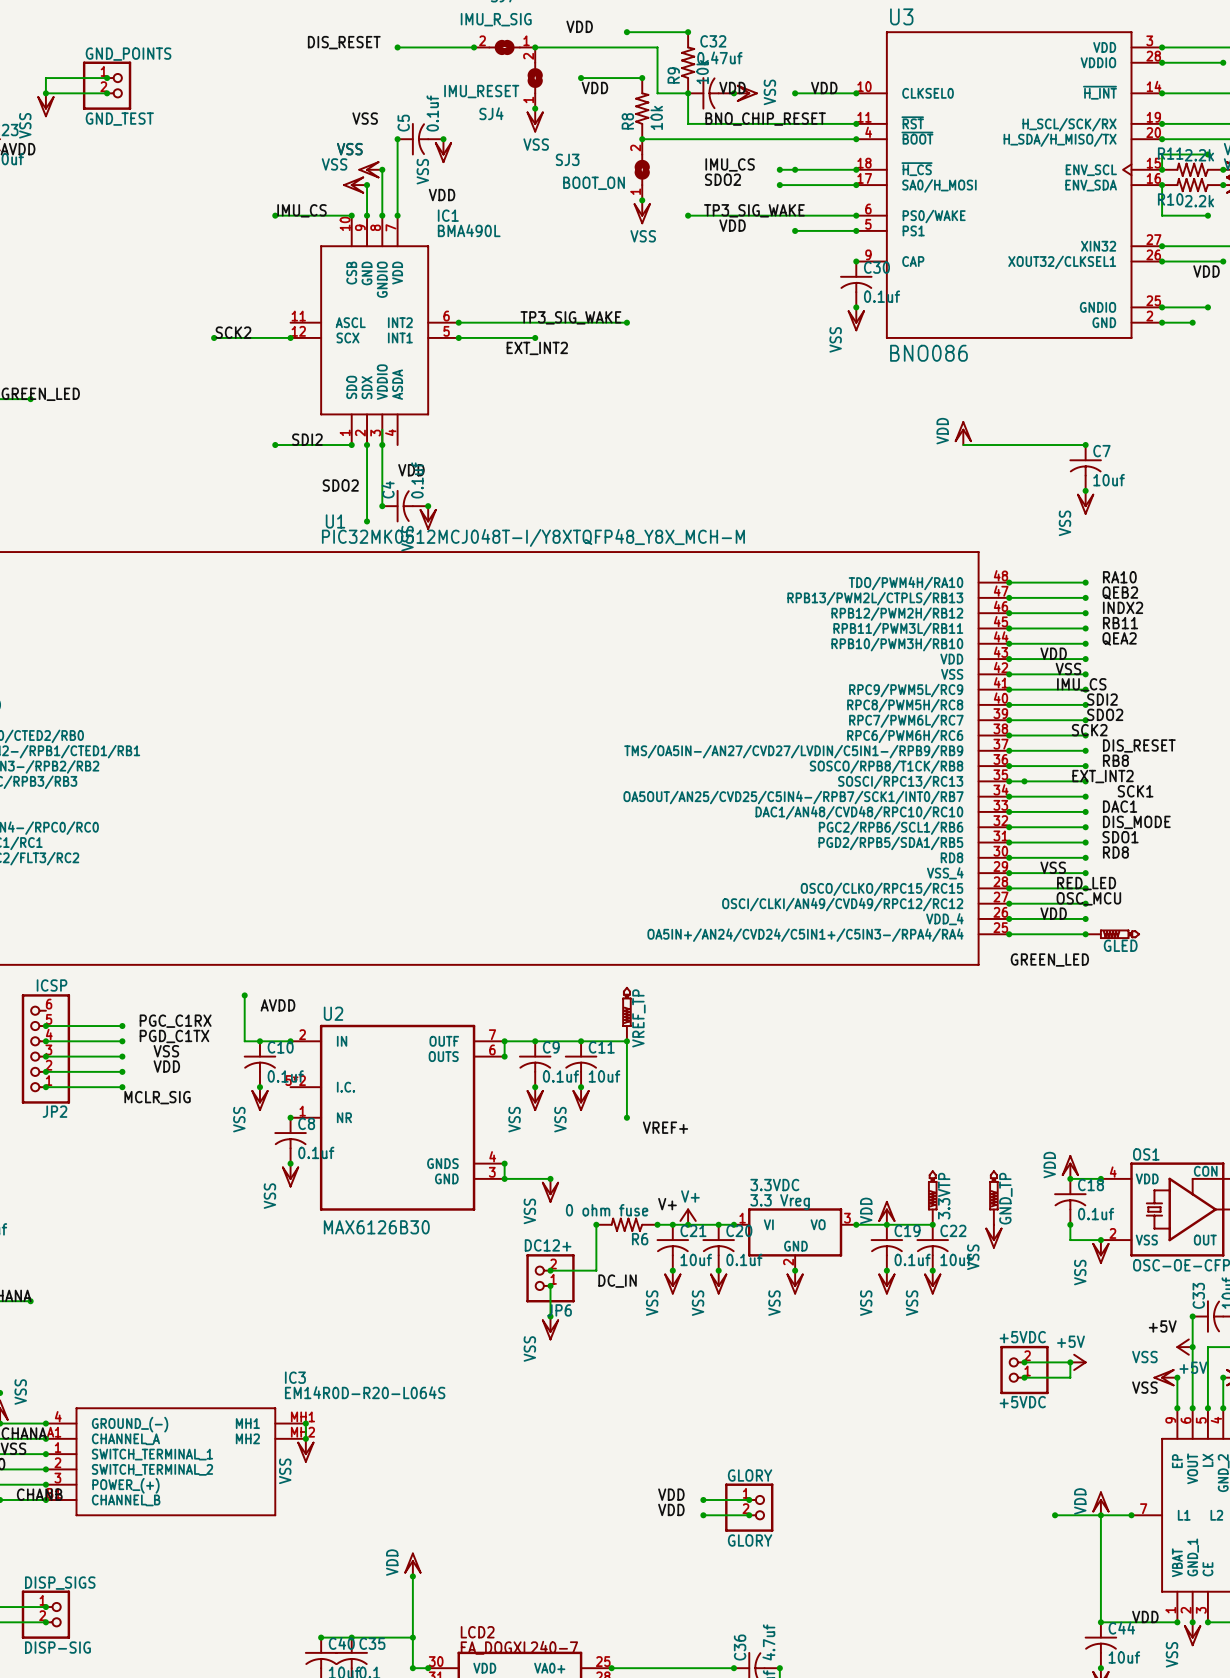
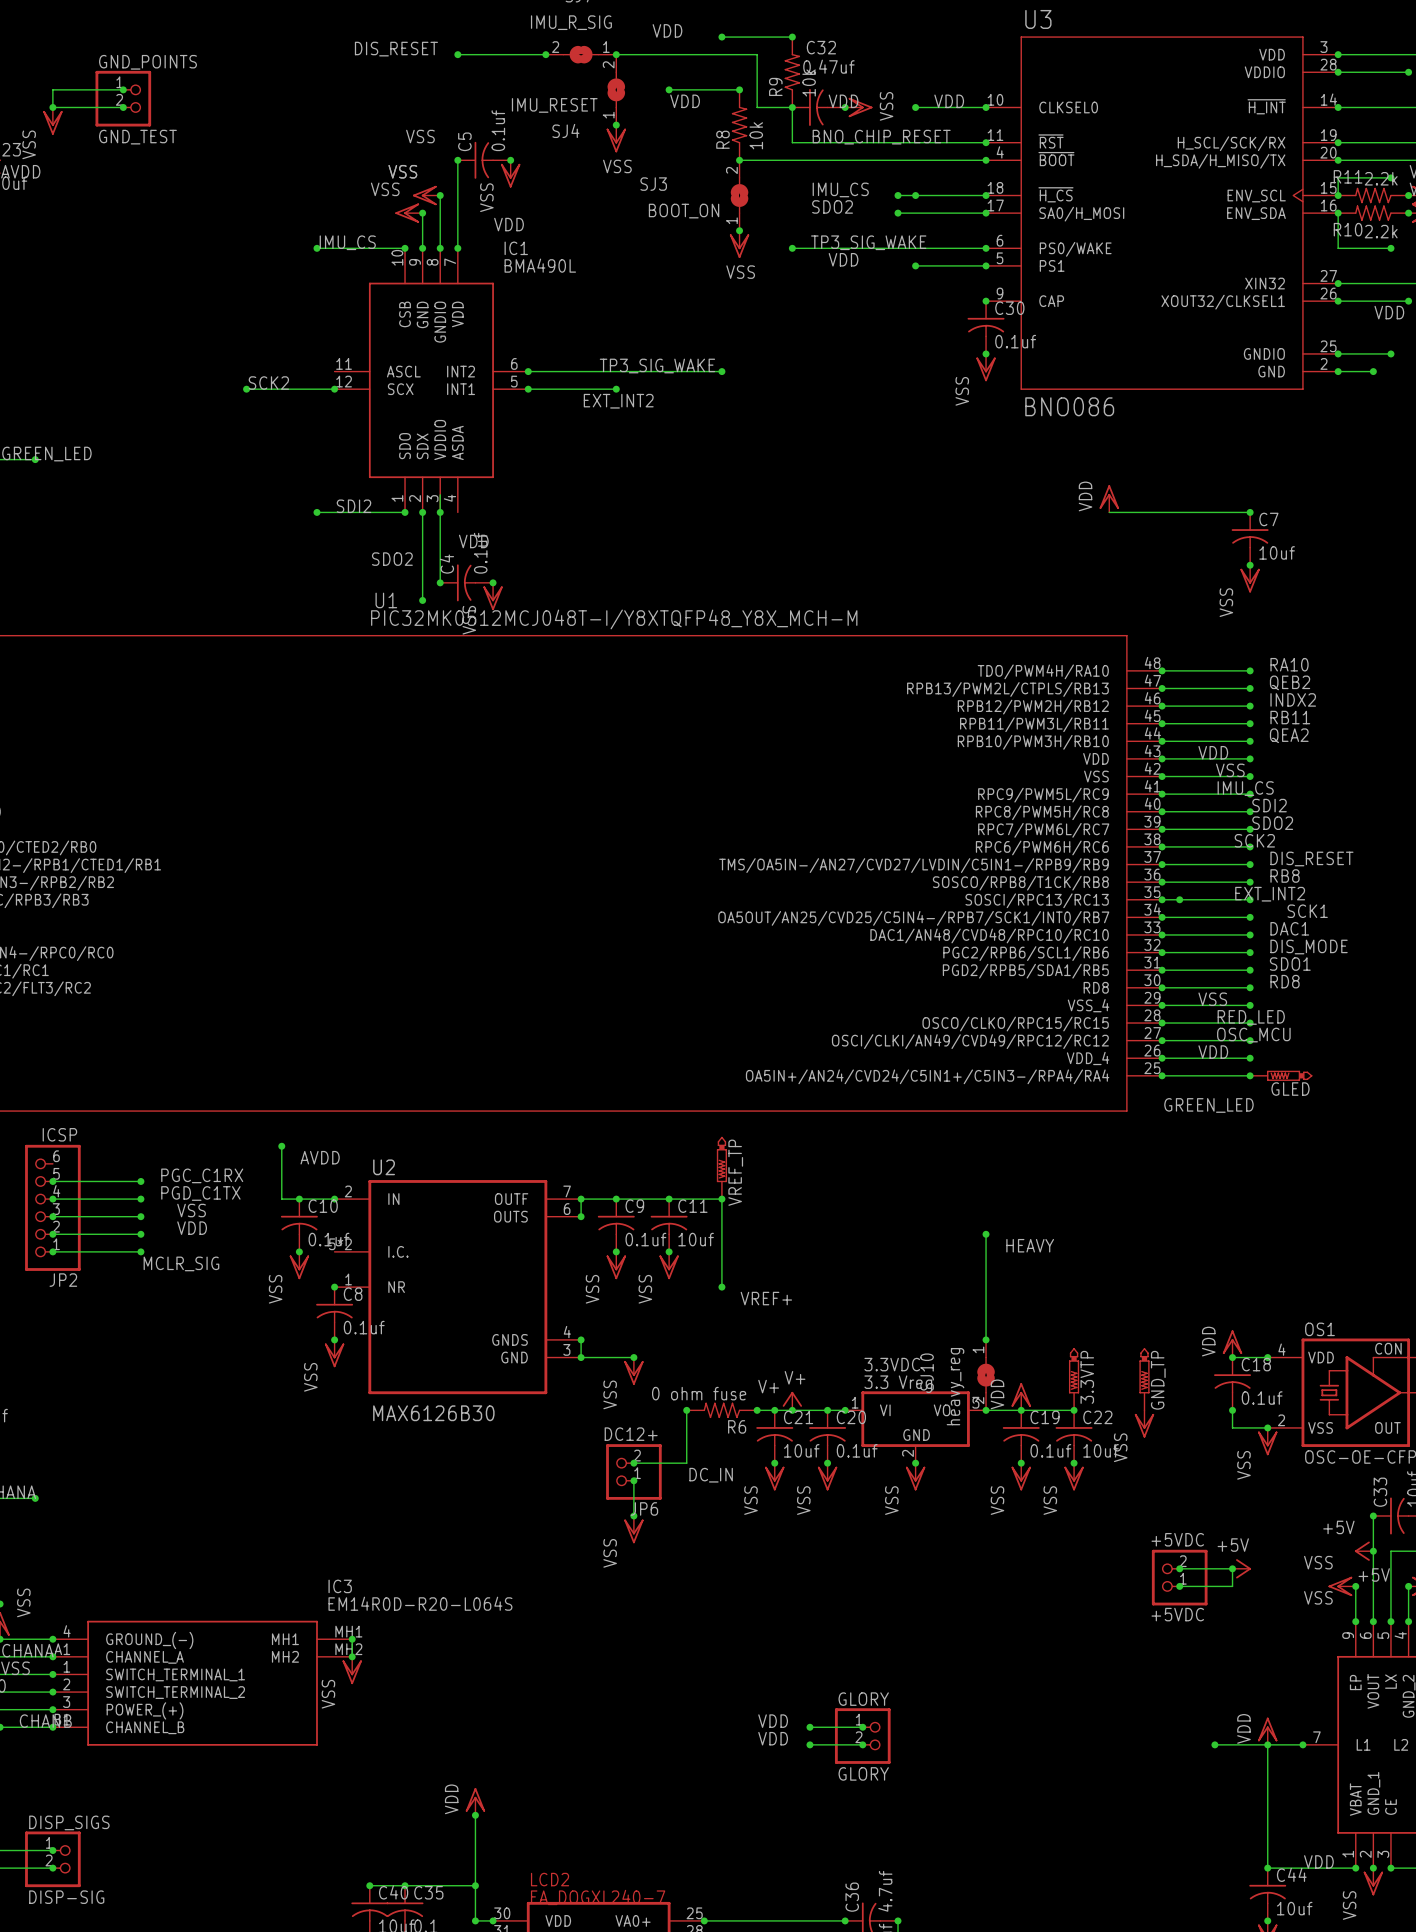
wire: none -> (986, 1234) (986, 1339)
junction: none -> (986, 1234)
label: none -> HEAVY (1030, 1245)
junction: none -> (986, 1339)
SJ10: none -> heavy_reg (986, 1375)

